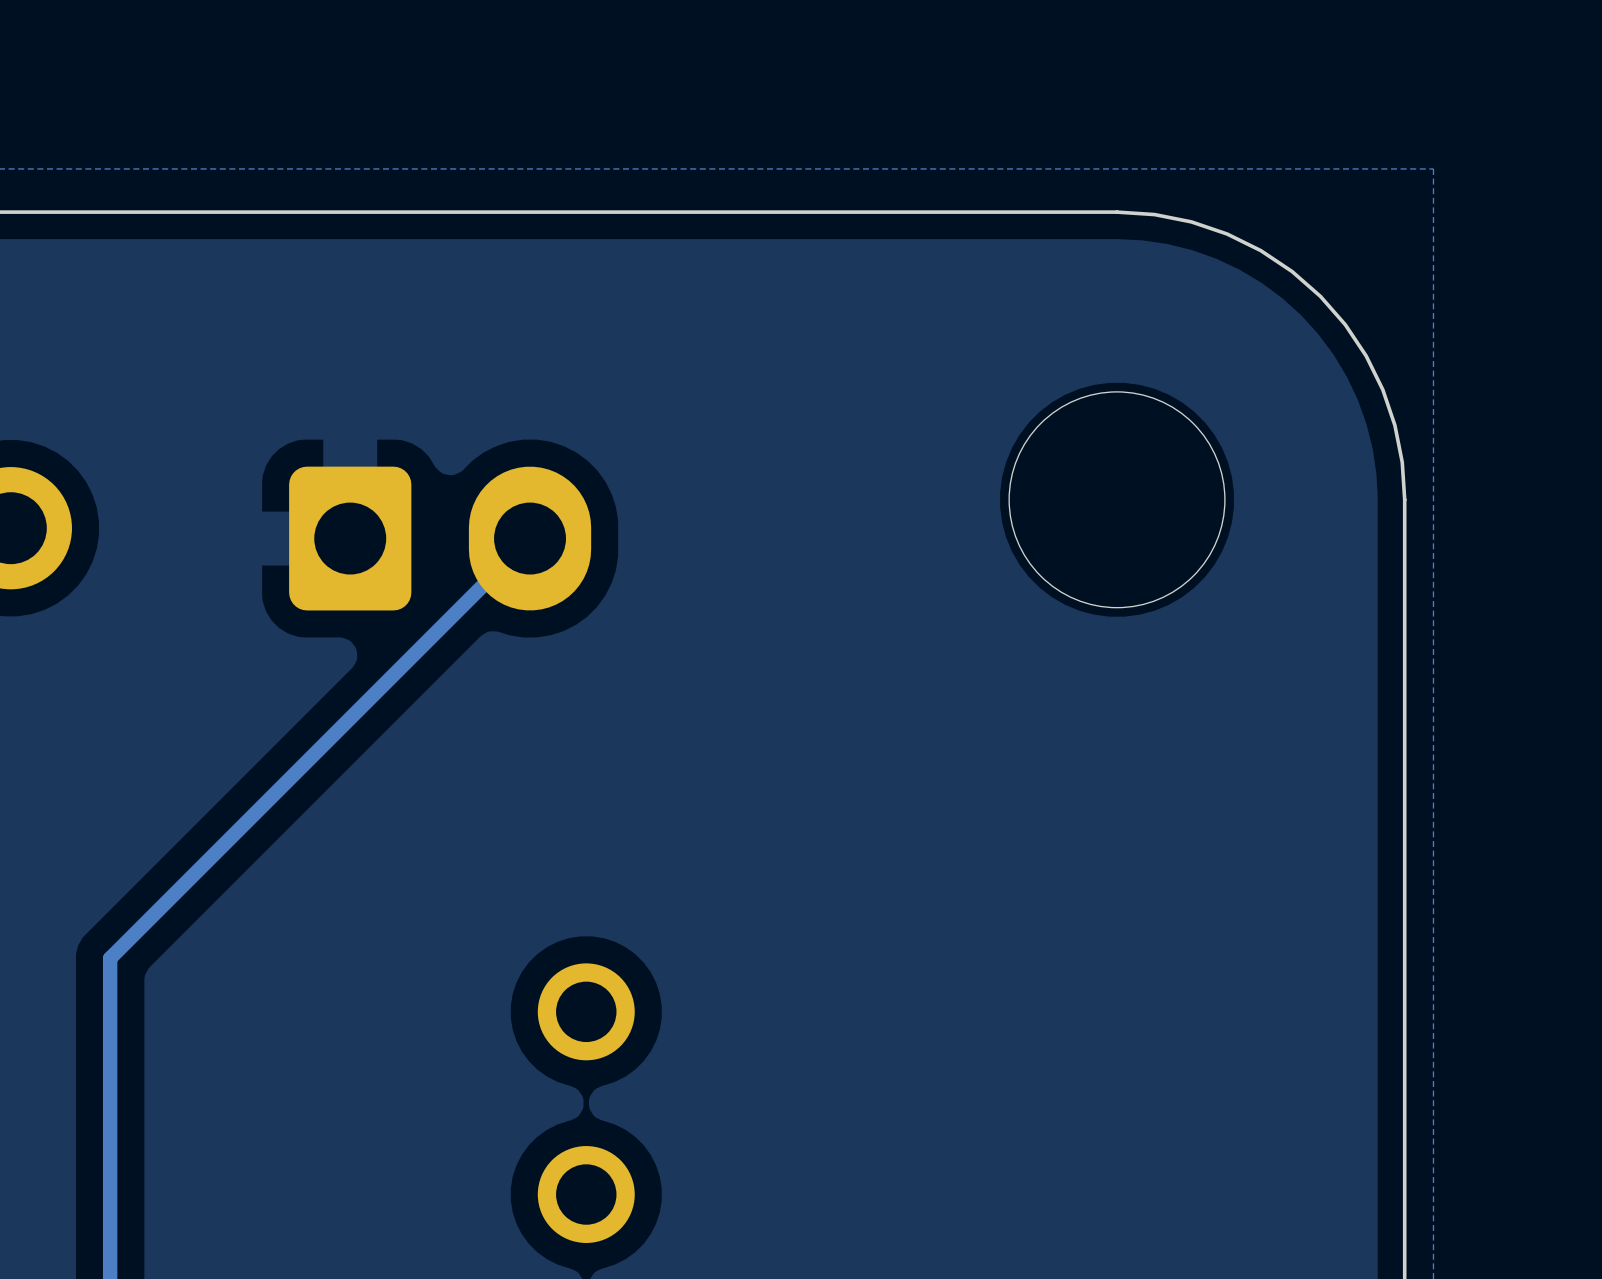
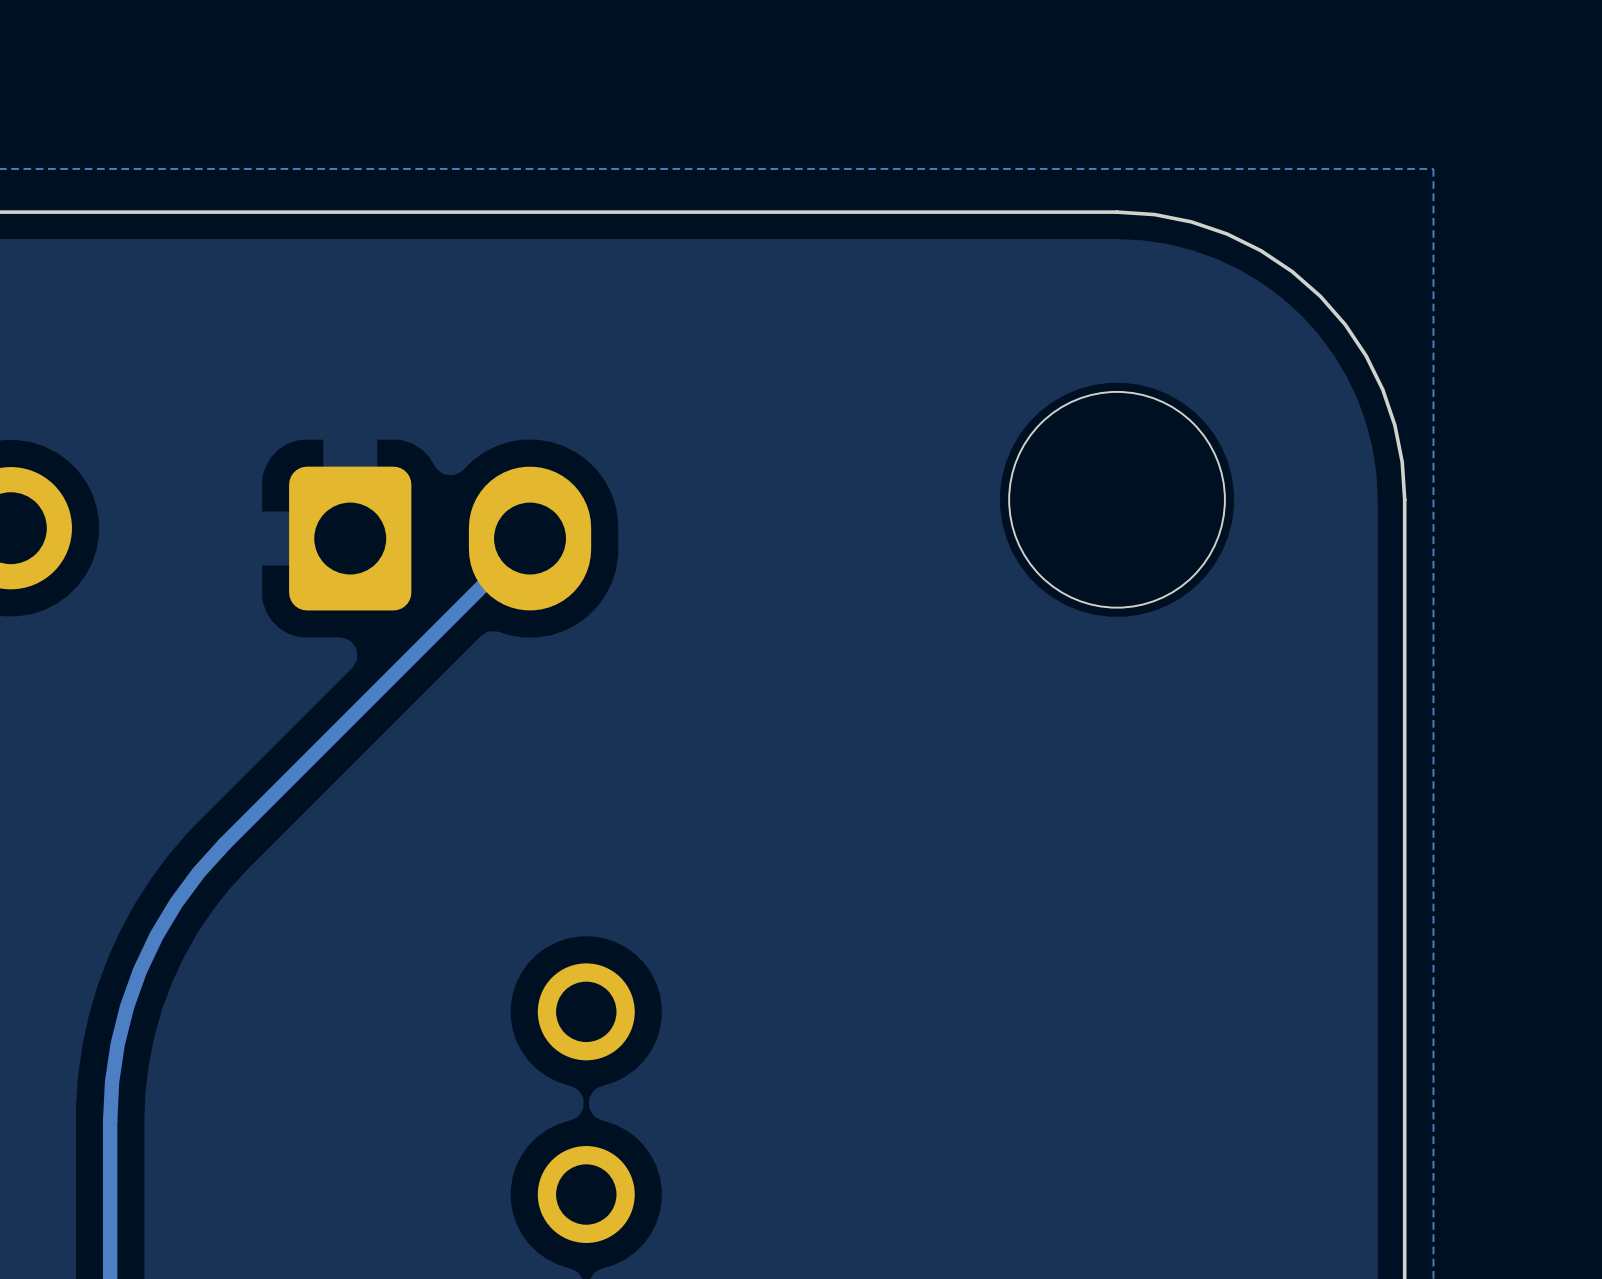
track: (224, 843) (110, 958) (110, 1120) -> (224, 843) (199, 872) (176, 903) (156, 936) (139, 970) (127, 1006) (117, 1044) (112, 1082) (110, 1120)

